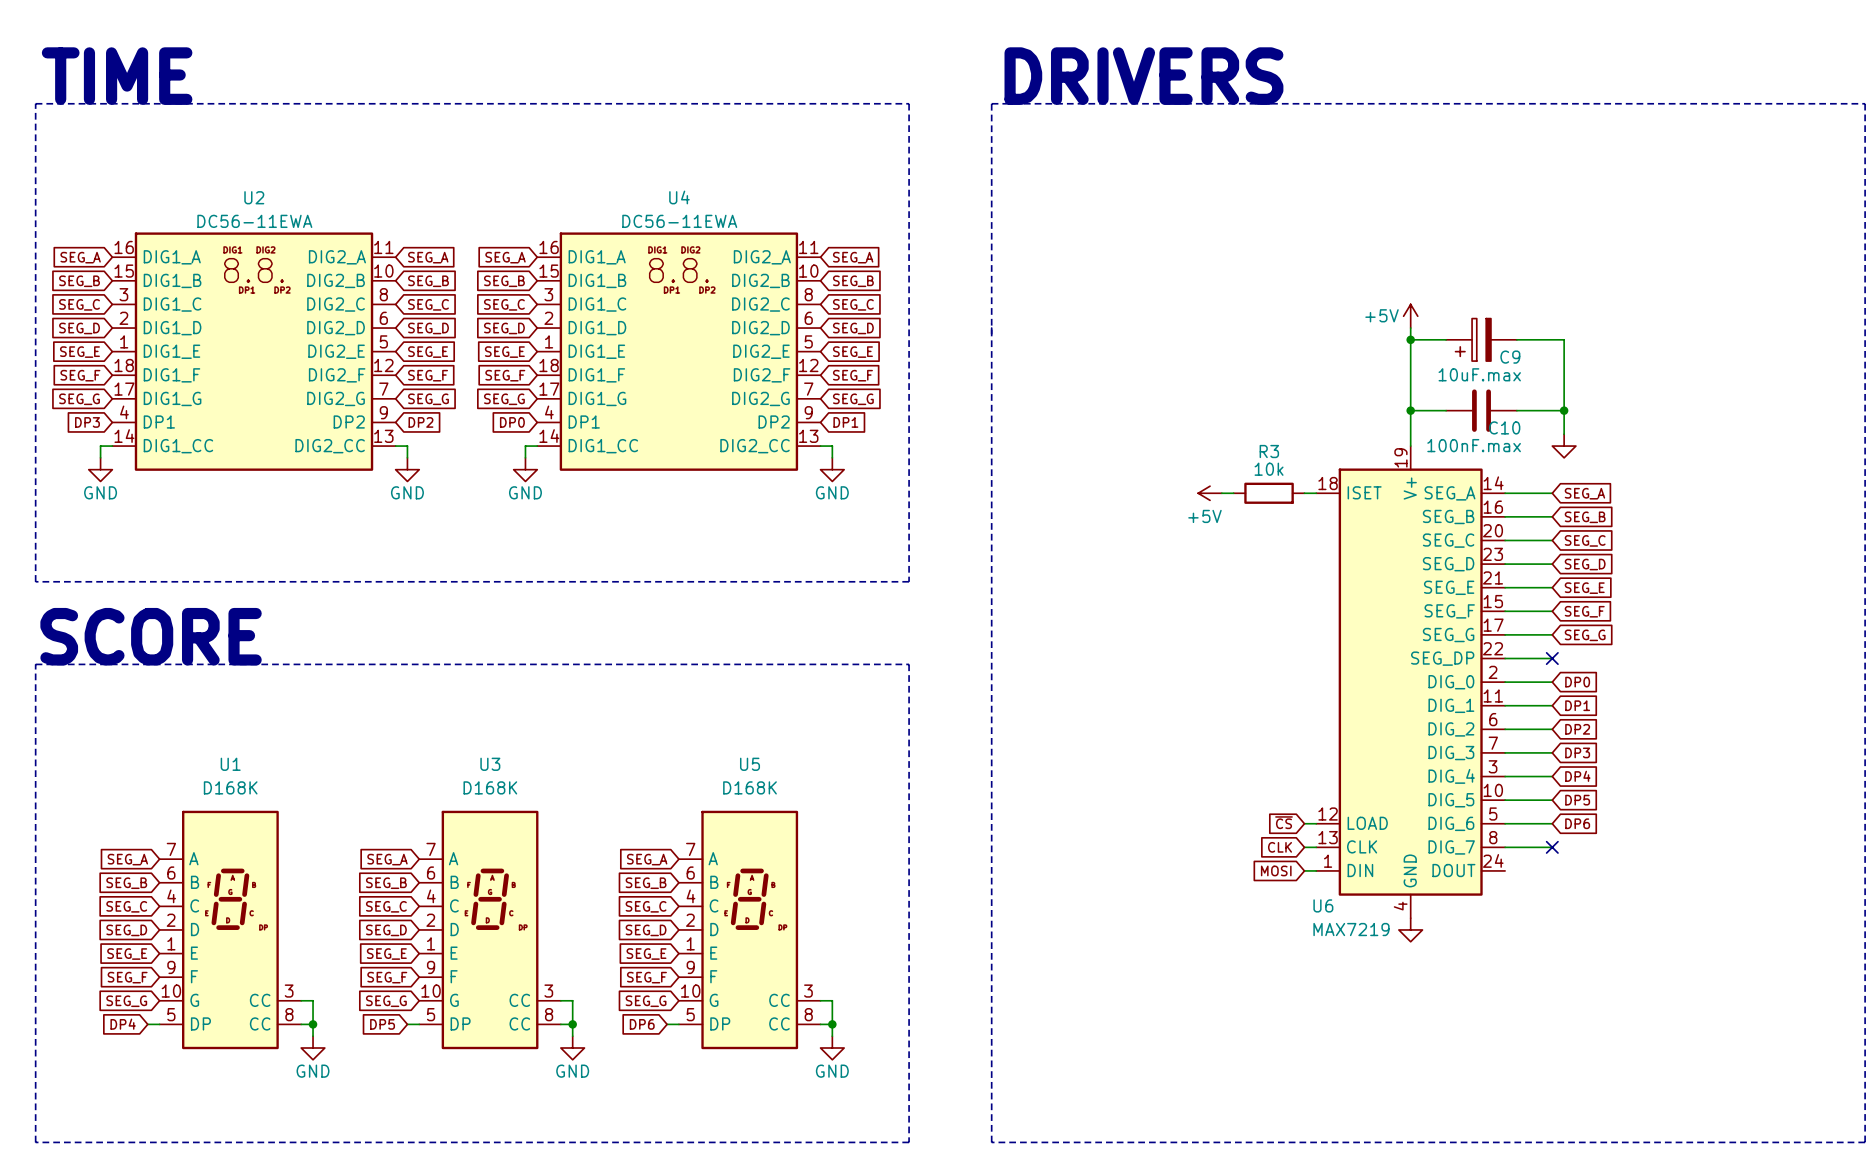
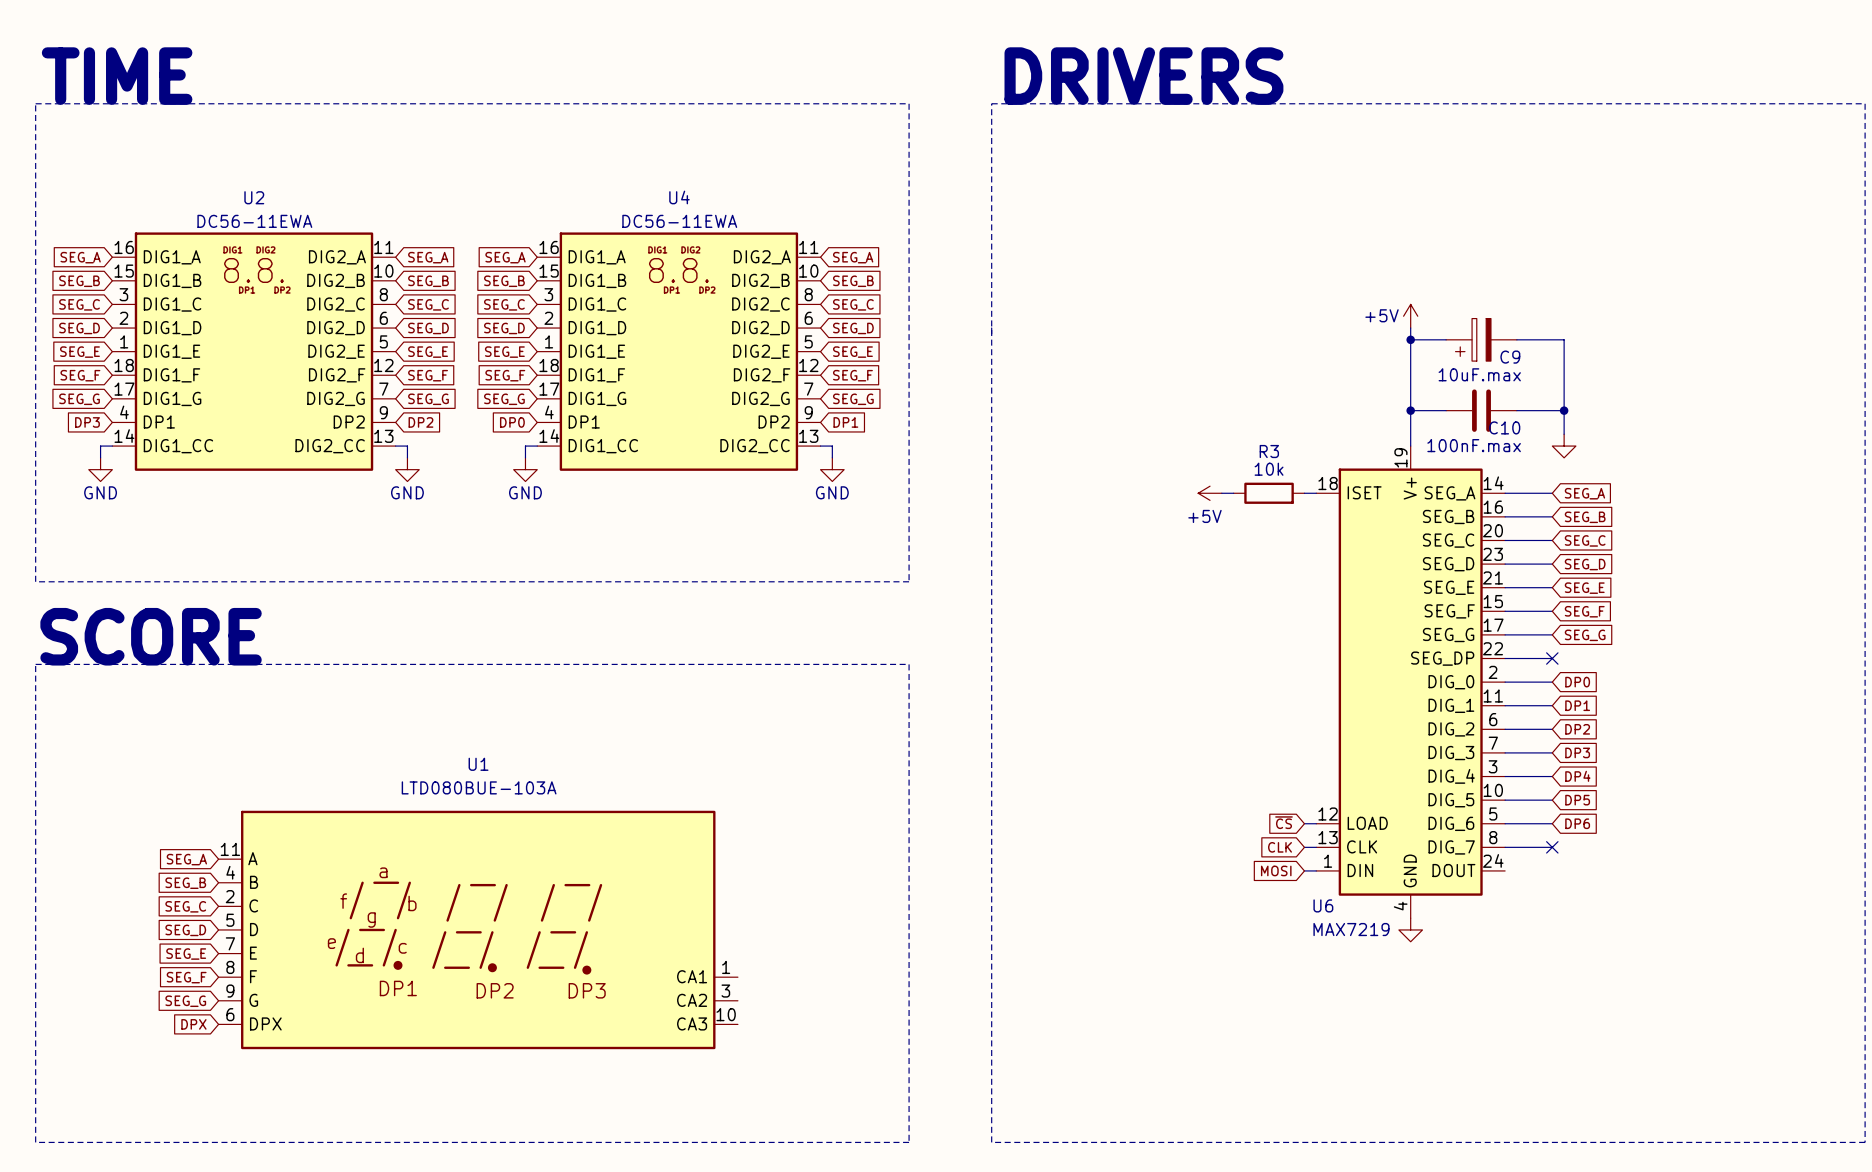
U1 value: D168K (230, 787) -> LTD080BUE-103A (479, 787)
U1 symbol: [159, 810, 302, 1050] -> [218, 810, 738, 1050]
global label position: SEG_A (127, 859) -> SEG_A (186, 859)
global label: SEG_A (387, 859) -> none
global label: SEG_A (647, 859) -> none
global label position: SEG_B (126, 883) -> SEG_B (185, 883)
global label: SEG_B (386, 883) -> none
global label: SEG_B (646, 883) -> none
global label position: SEG_C (126, 906) -> SEG_C (185, 906)
global label: SEG_C (386, 906) -> none
global label: SEG_C (646, 906) -> none
U3: D168K (490, 929) -> none
U5: D168K (749, 929) -> none
global label position: SEG_D (126, 930) -> SEG_D (185, 930)
global label: SEG_D (386, 930) -> none
global label: SEG_D (646, 930) -> none
global label position: SEG_E (127, 954) -> SEG_E (186, 954)
global label: SEG_E (386, 954) -> none
global label: SEG_E (646, 954) -> none
global label position: SEG_F (127, 977) -> SEG_F (186, 977)
global label: SEG_F (387, 977) -> none
global label: SEG_F (646, 977) -> none
wire: (820, 1000) (832, 1000) (832, 1036) -> none
global label position: SEG_G (126, 1001) -> SEG_G (185, 1001)
global label: SEG_G (386, 1001) -> none
global label: SEG_G (646, 1001) -> none
global label: DP4 (123, 1024) -> none
wire: (147, 1024) (159, 1024) -> none
global label: none -> DPX (193, 1024)
junction: (313, 1024) -> none
global label: DP5 (382, 1024) -> none
junction: (572, 1024) -> none
global label: DP6 (642, 1024) -> none
wire: (820, 1024) (832, 1024) -> none
junction: (832, 1024) -> none
power symbol: GND (313, 1048) -> none
power symbol: GND (572, 1048) -> none
power symbol: GND (832, 1048) -> none

